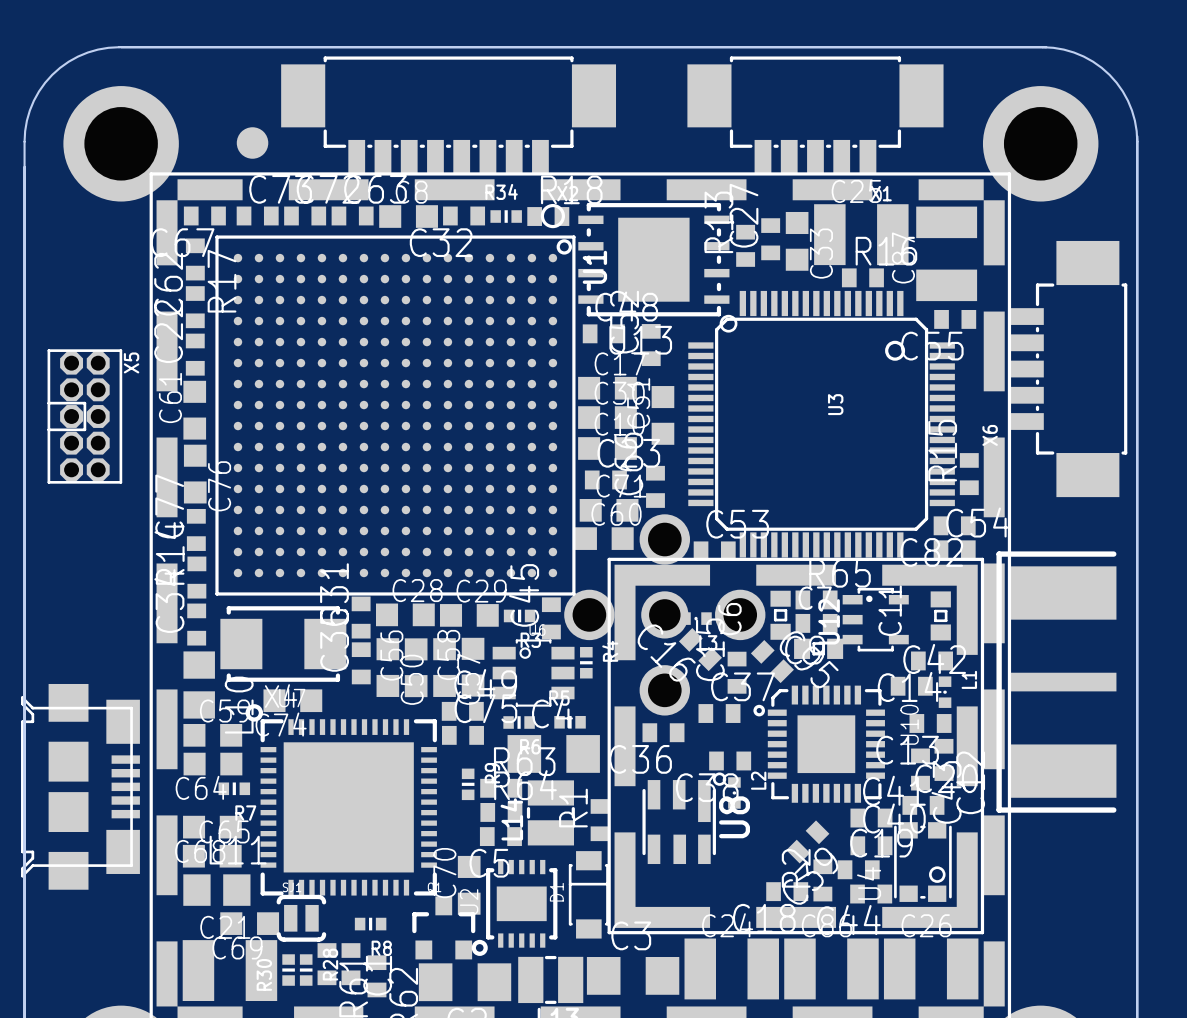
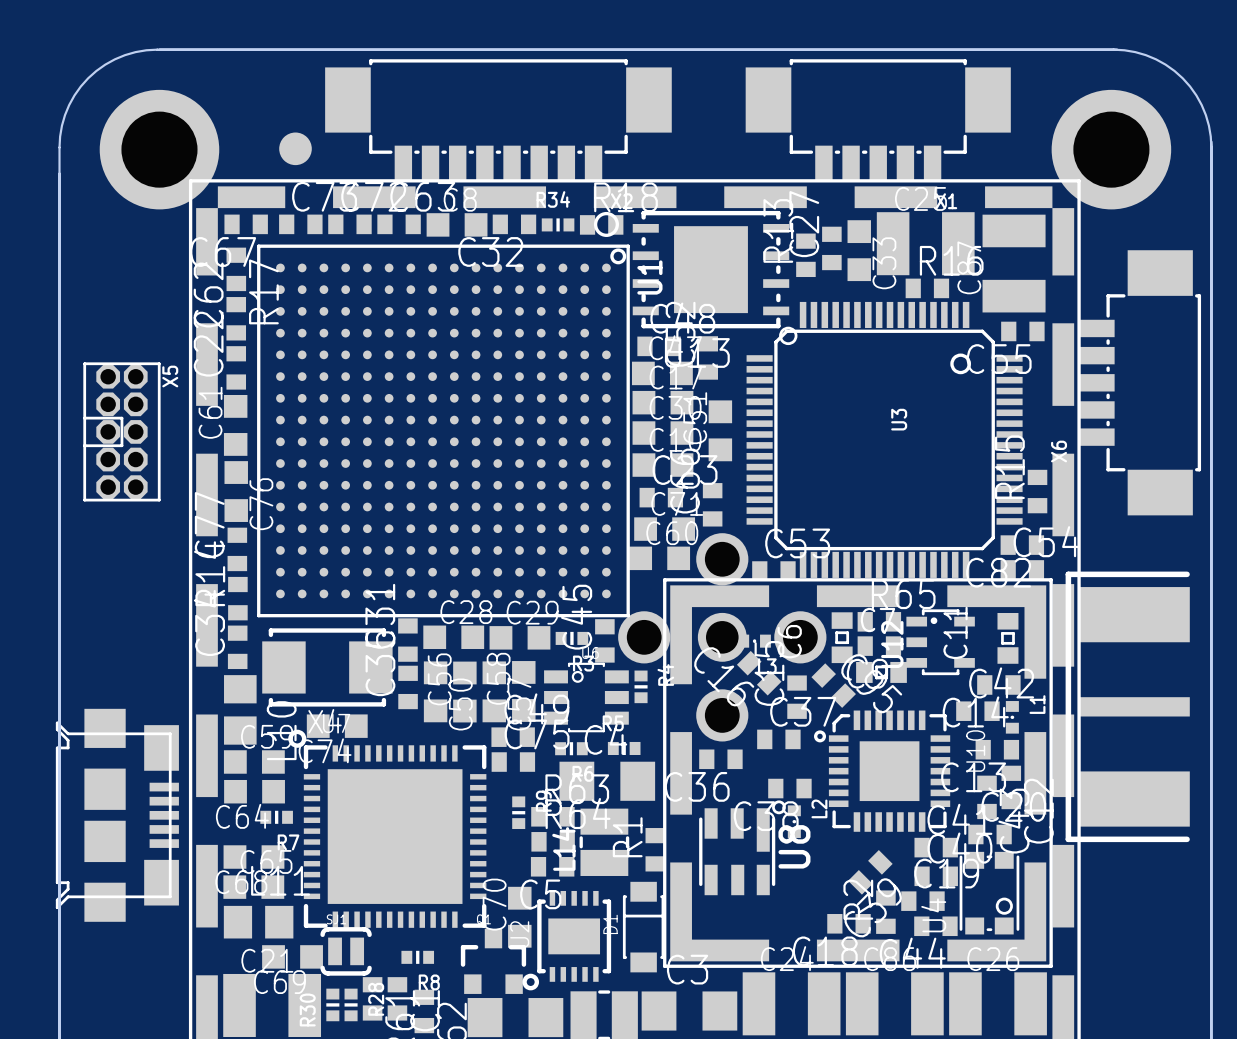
part: none -> (662, 373)

